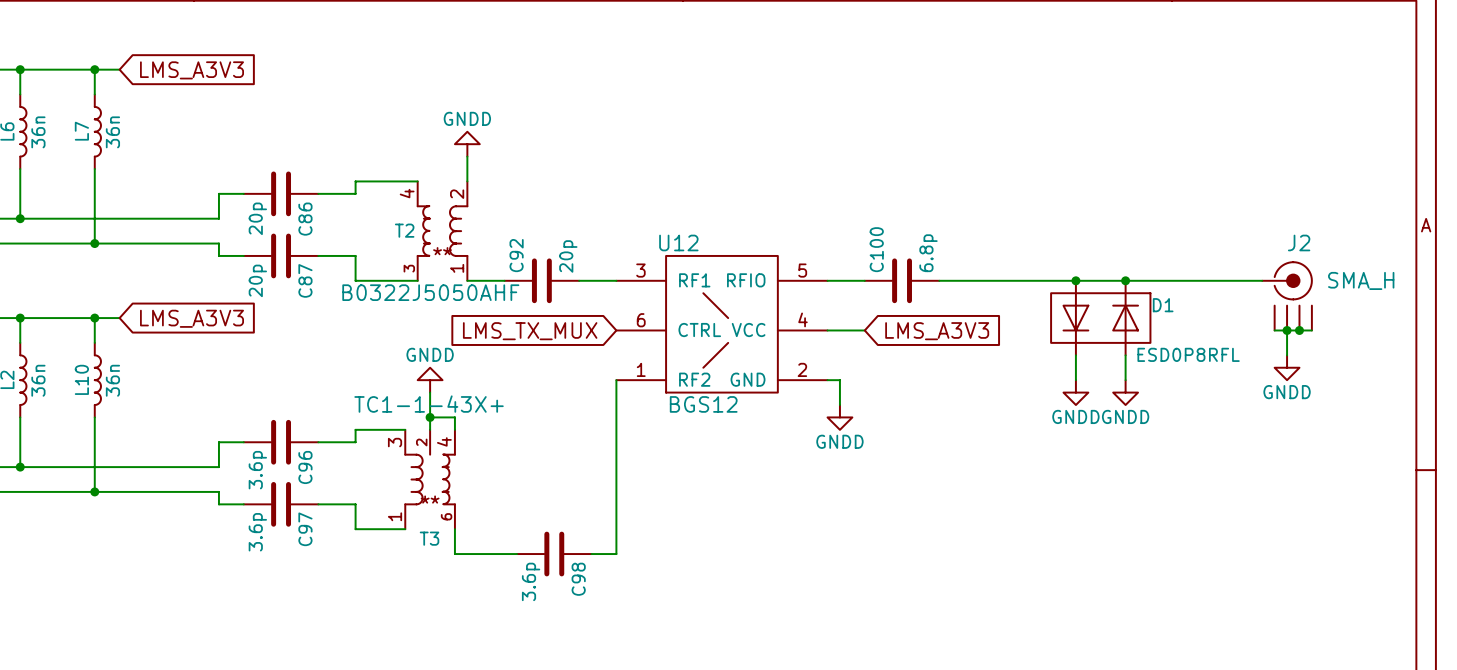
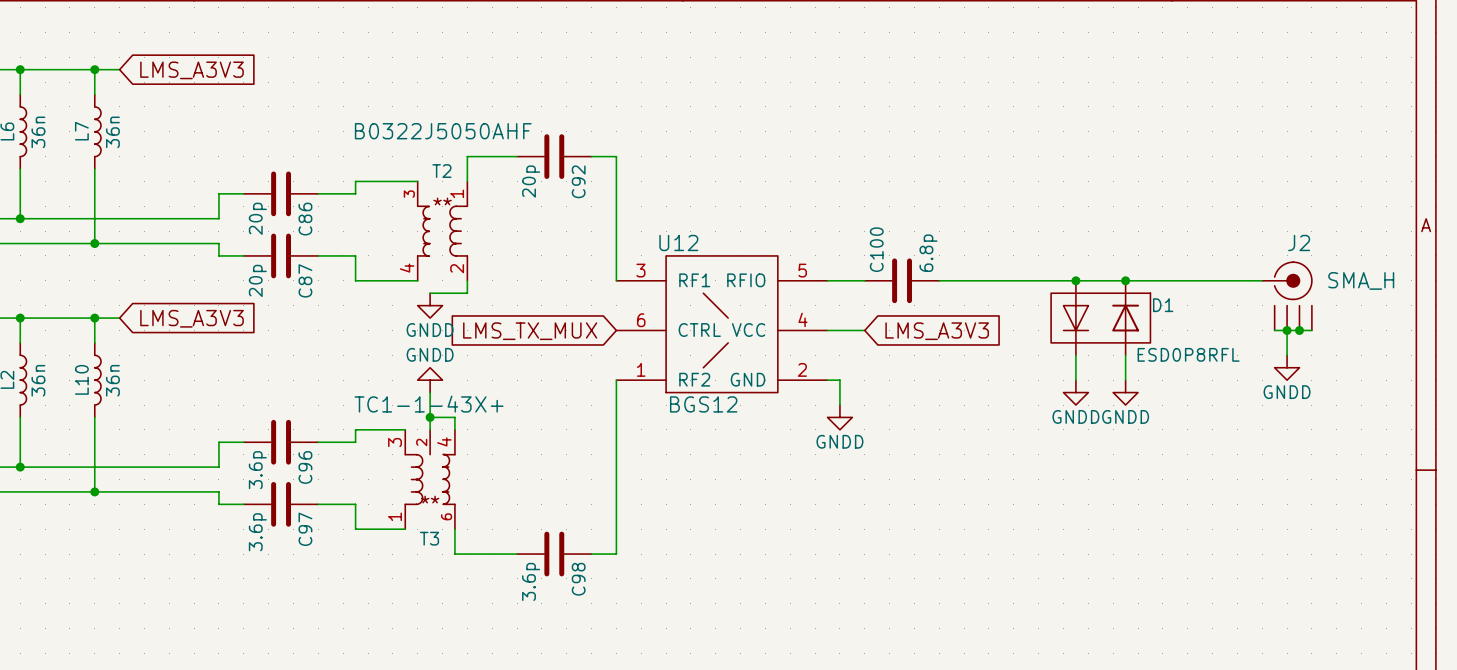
power symbol rotation: 0° (467, 144) -> 180° (430, 305)
power symbol position: GNDD (467, 144) -> GNDD (430, 305)
wire: none -> (467, 156) (517, 156)
T2 name position: T2 (404, 230) -> T2 (441, 171)
T2 flip: as is (442, 231) -> up-down (442, 231)
C92 name position: C92 (516, 255) -> C92 (578, 181)
C92 value position: 20p (568, 256) -> 20p (531, 181)
wire: (467, 280) (504, 280) -> (467, 280) (467, 293) (430, 293)
C92 position: (541, 280) -> (554, 156)
wire: (579, 280) (616, 280) -> (591, 156) (616, 156) (616, 280)
T2 text position: B0322J5050AHF (430, 292) -> B0322J5050AHF (443, 131)

